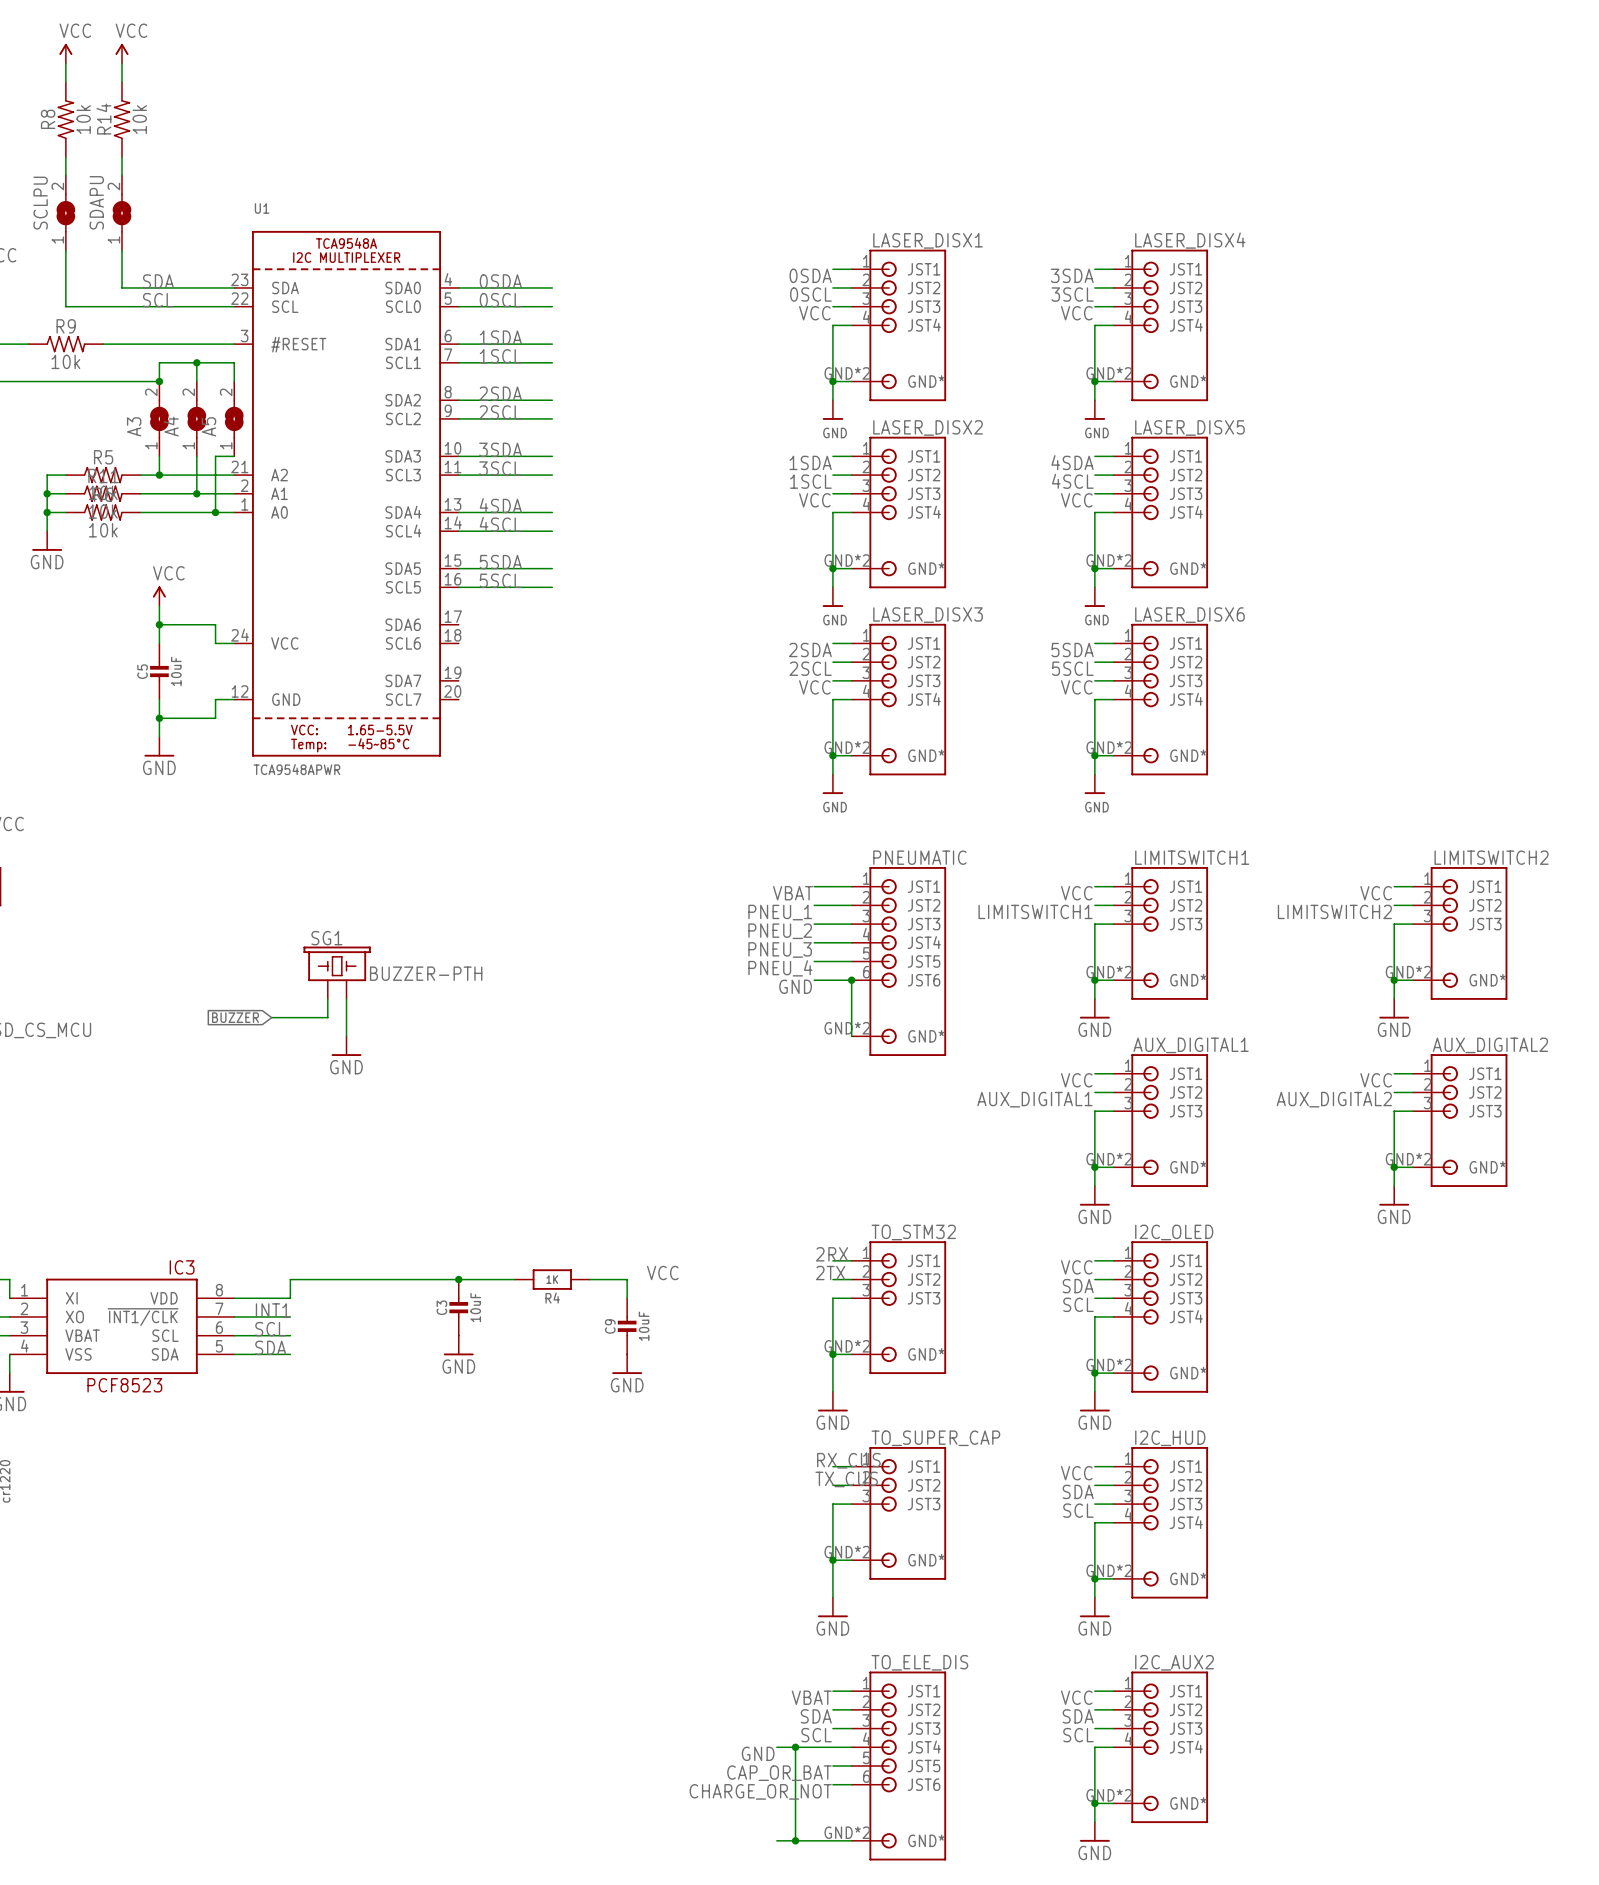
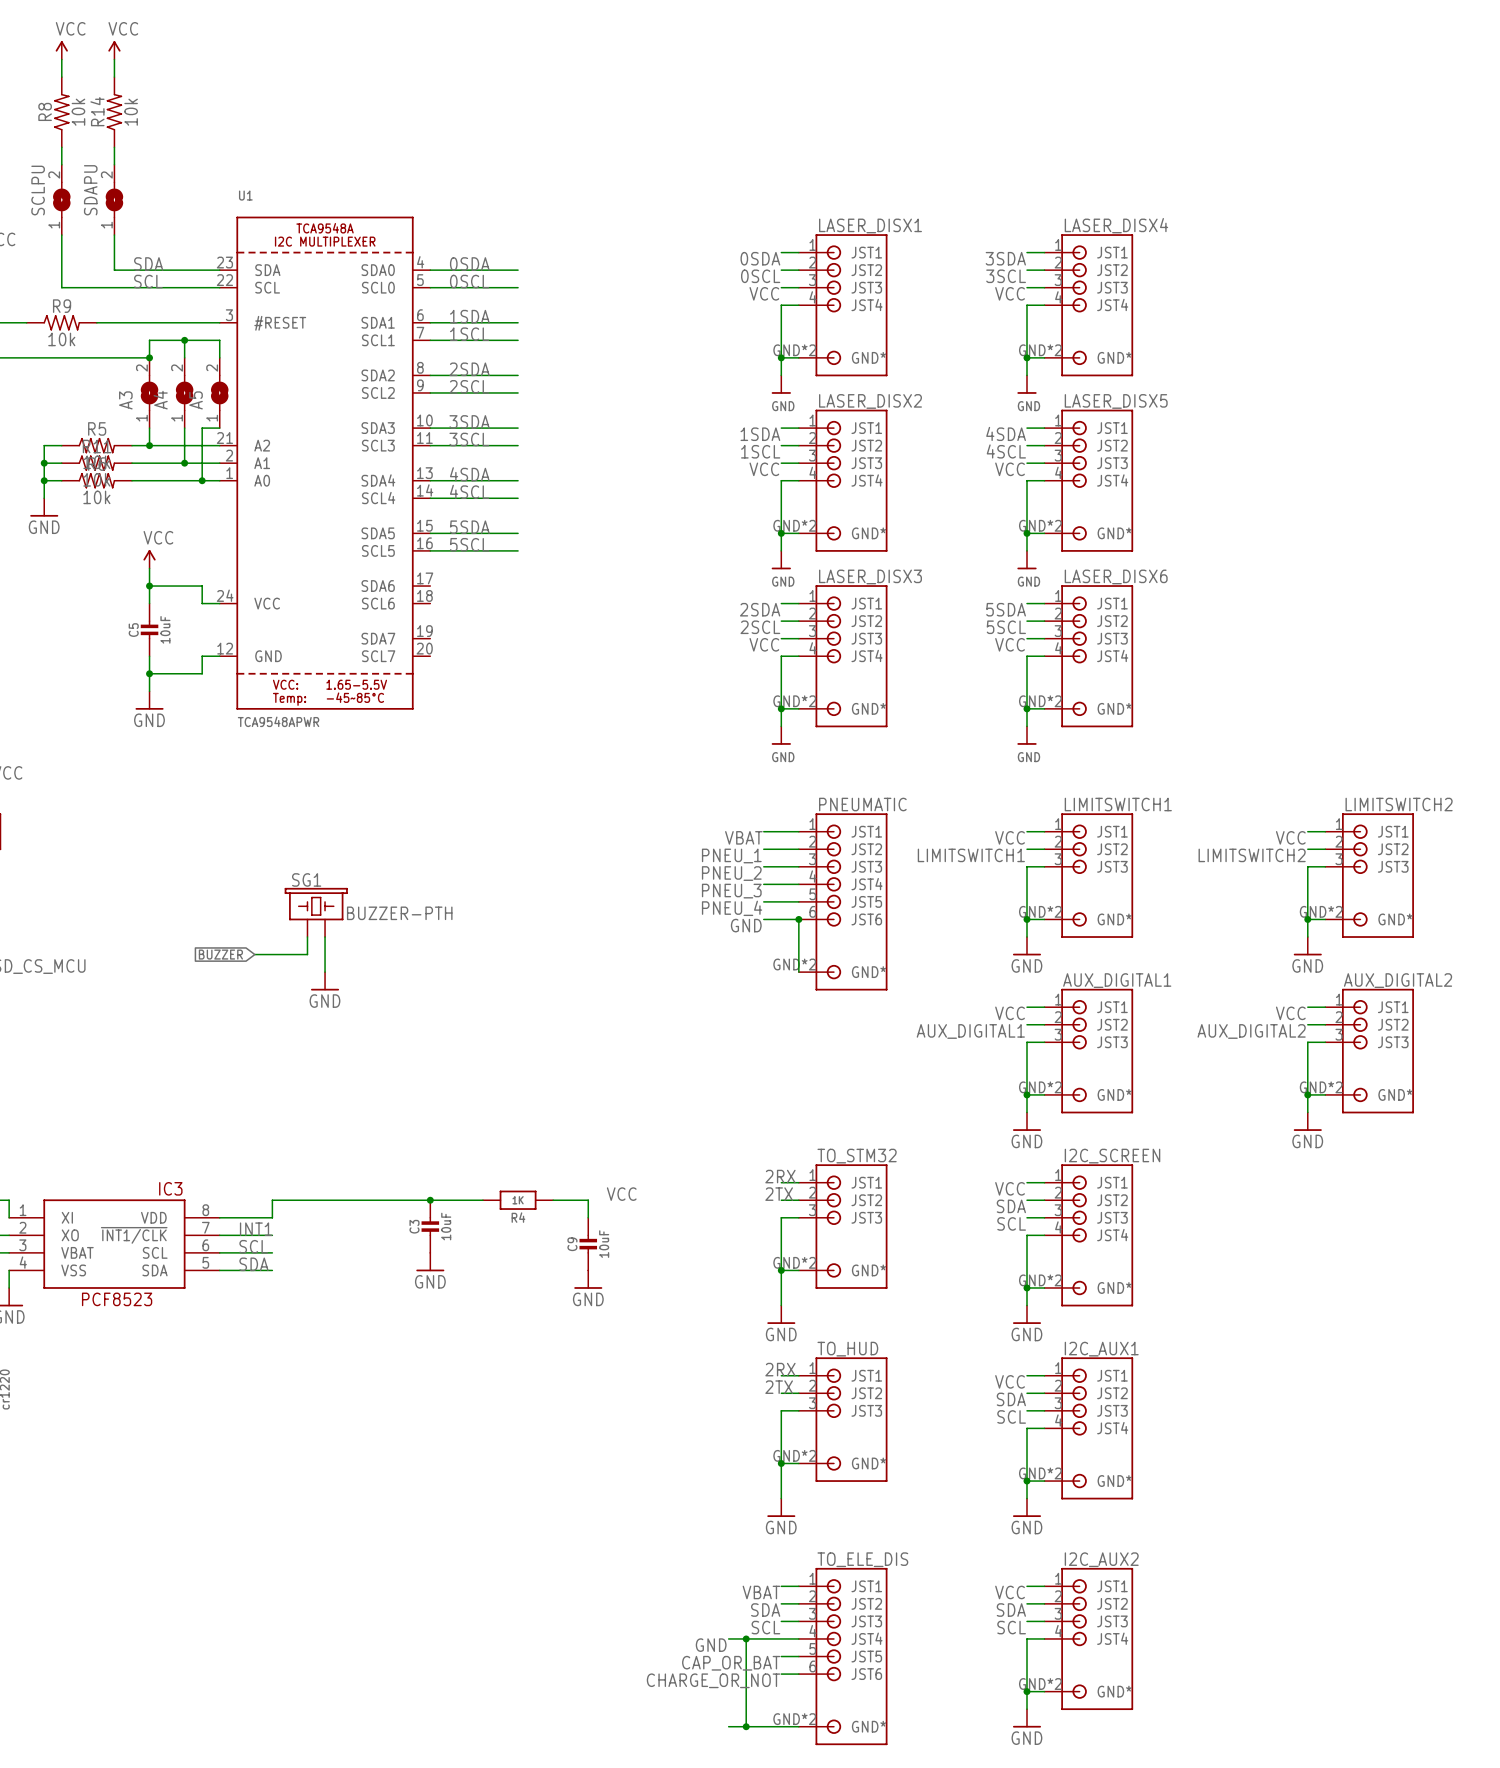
I2C_OLED name: I2C_OLED (1174, 1232) -> I2C_SCREEN (1112, 1156)
TO_SUPER_CAP name: TO_SUPER_CAP (935, 1438) -> TO_HUD (847, 1349)
I2C_HUD name: I2C_HUD (1170, 1438) -> I2C_AUX1 (1101, 1349)
label: RX_CUS (848, 1460) -> 2RX (780, 1369)
label: TX_CUS (846, 1479) -> 2TX (779, 1387)

